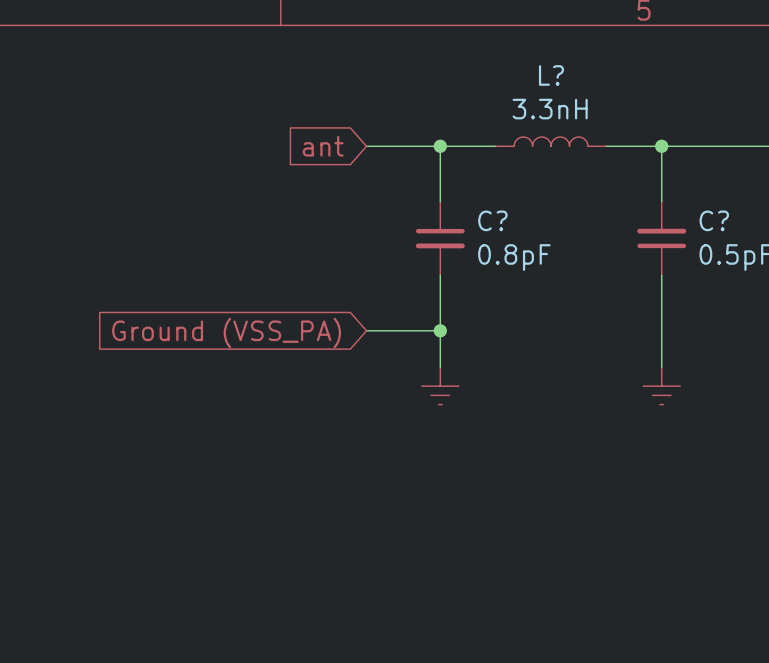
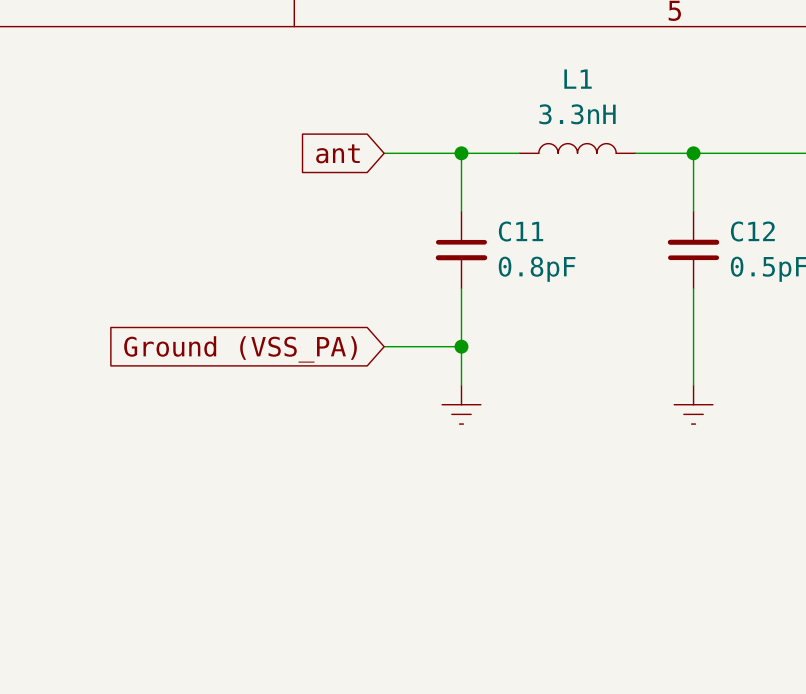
L? name: L? (551, 75) -> L1 (578, 79)
C? name: C? (492, 220) -> C11 (521, 231)
C? name: C? (714, 220) -> C12 (752, 231)

